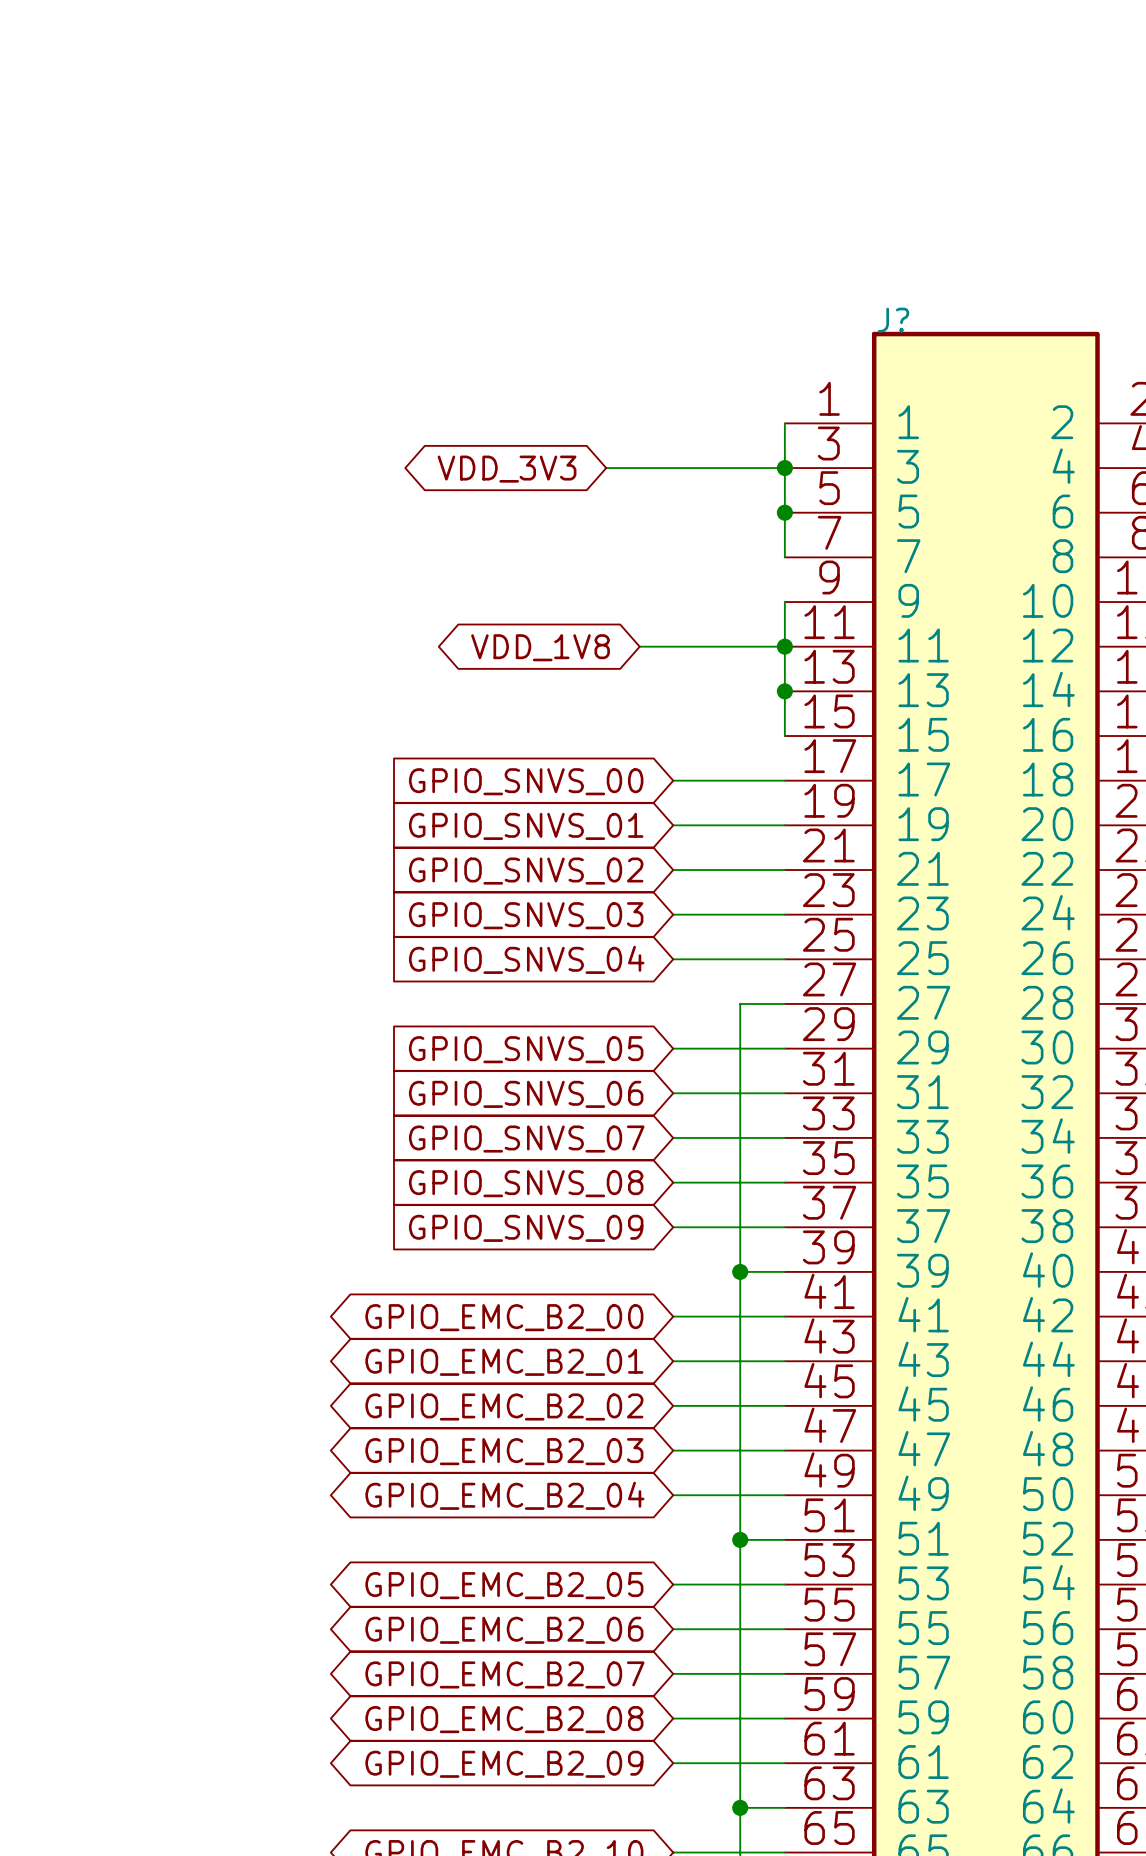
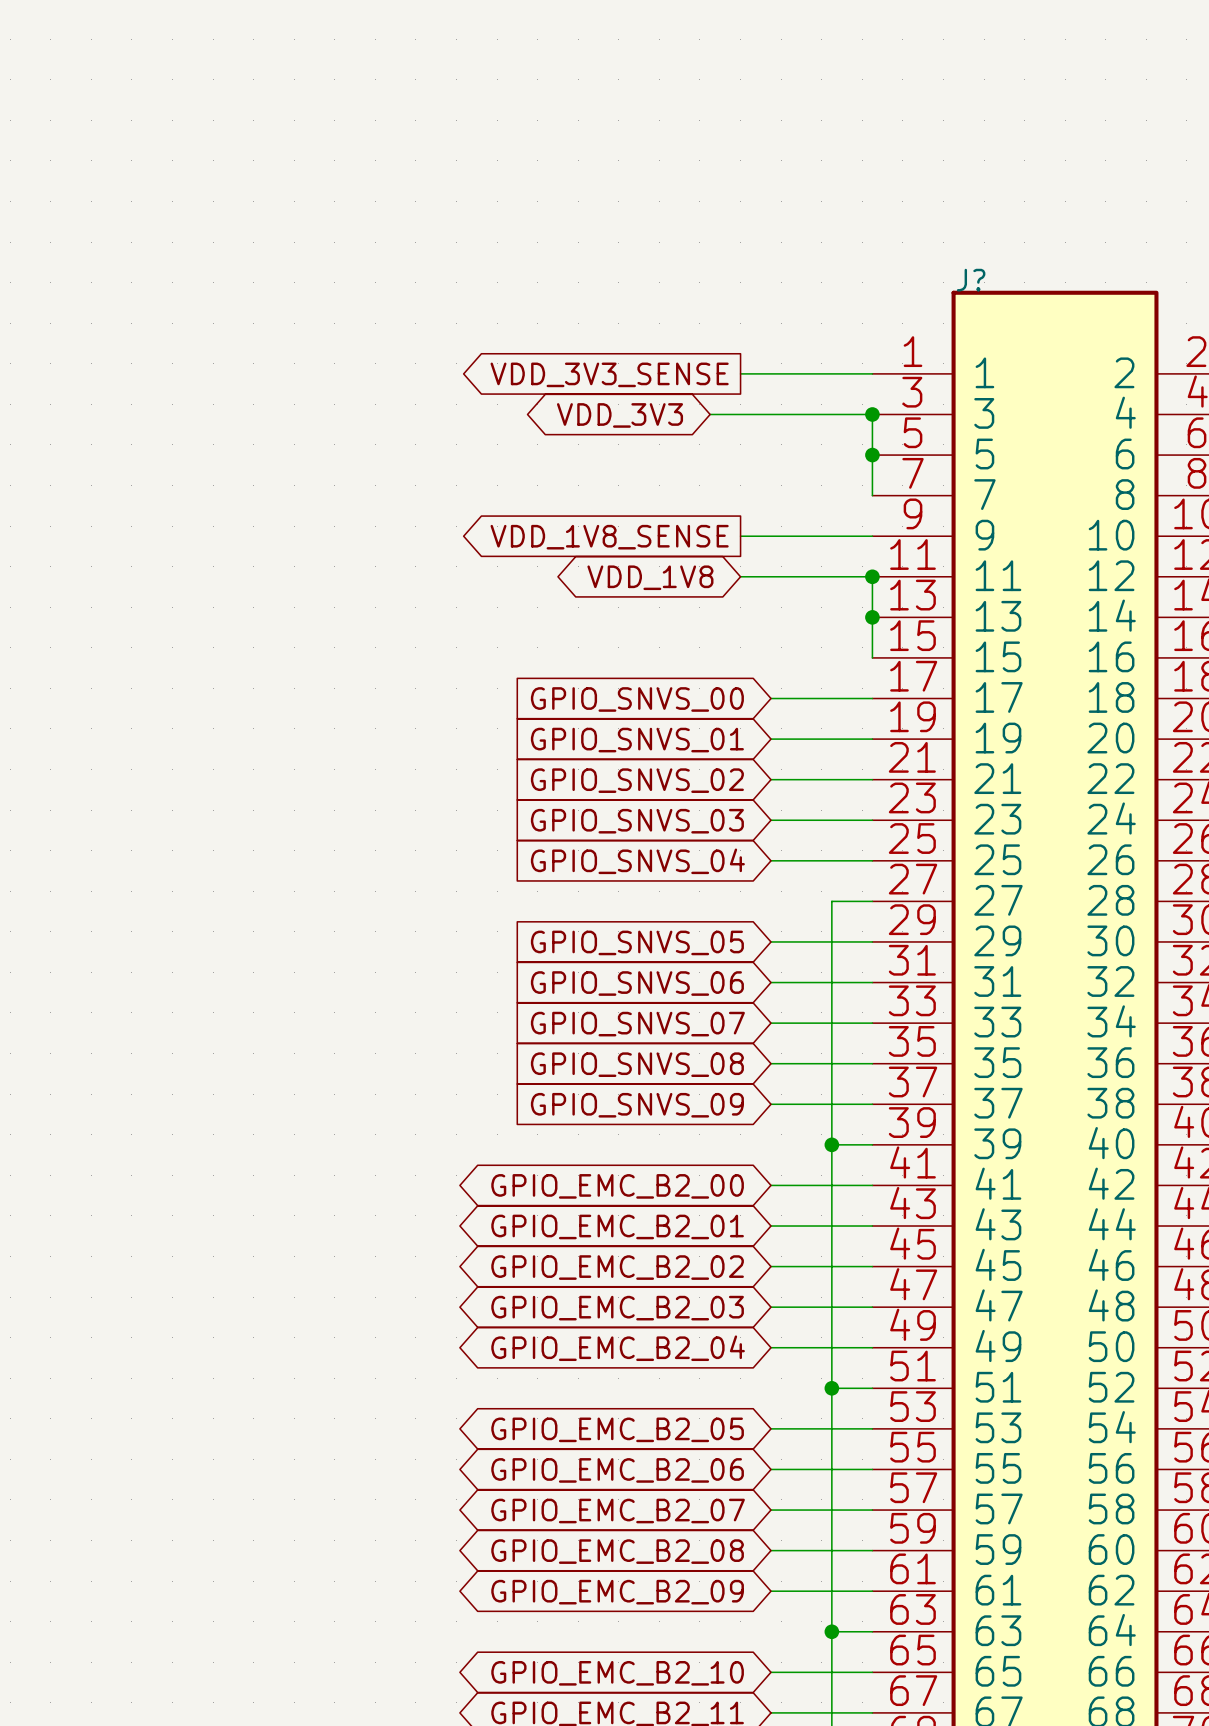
wire: (784, 423) (784, 468) -> (872, 373) (740, 373)
global label: none -> VDD_3V3_SENSE (609, 374)
wire: (784, 602) (784, 646) -> (872, 536) (740, 536)
global label: none -> VDD_1V8_SENSE (609, 537)

